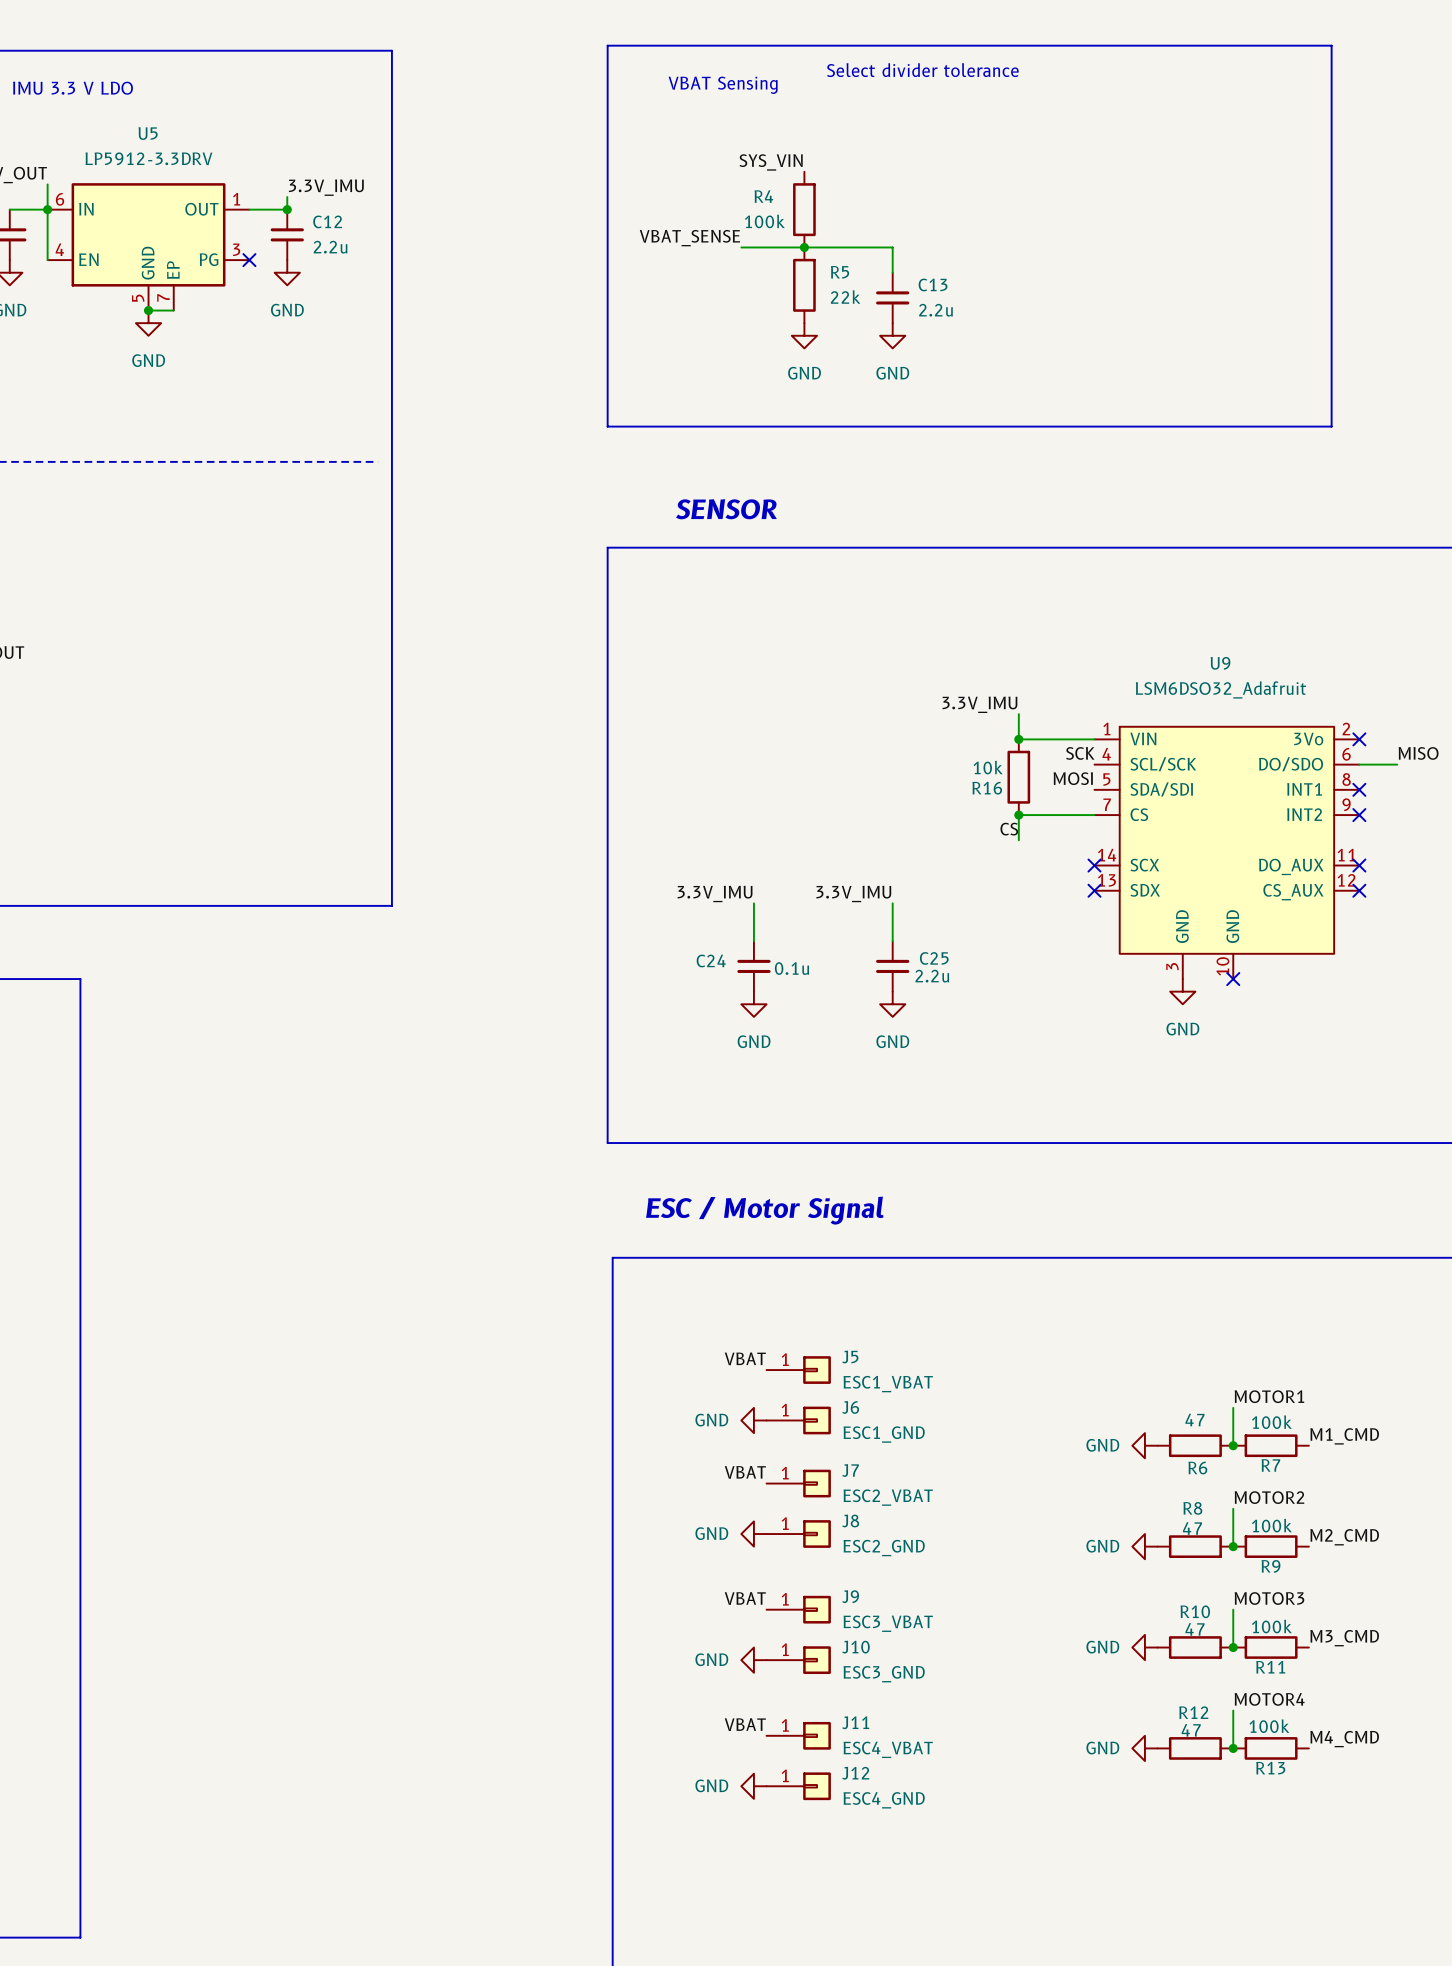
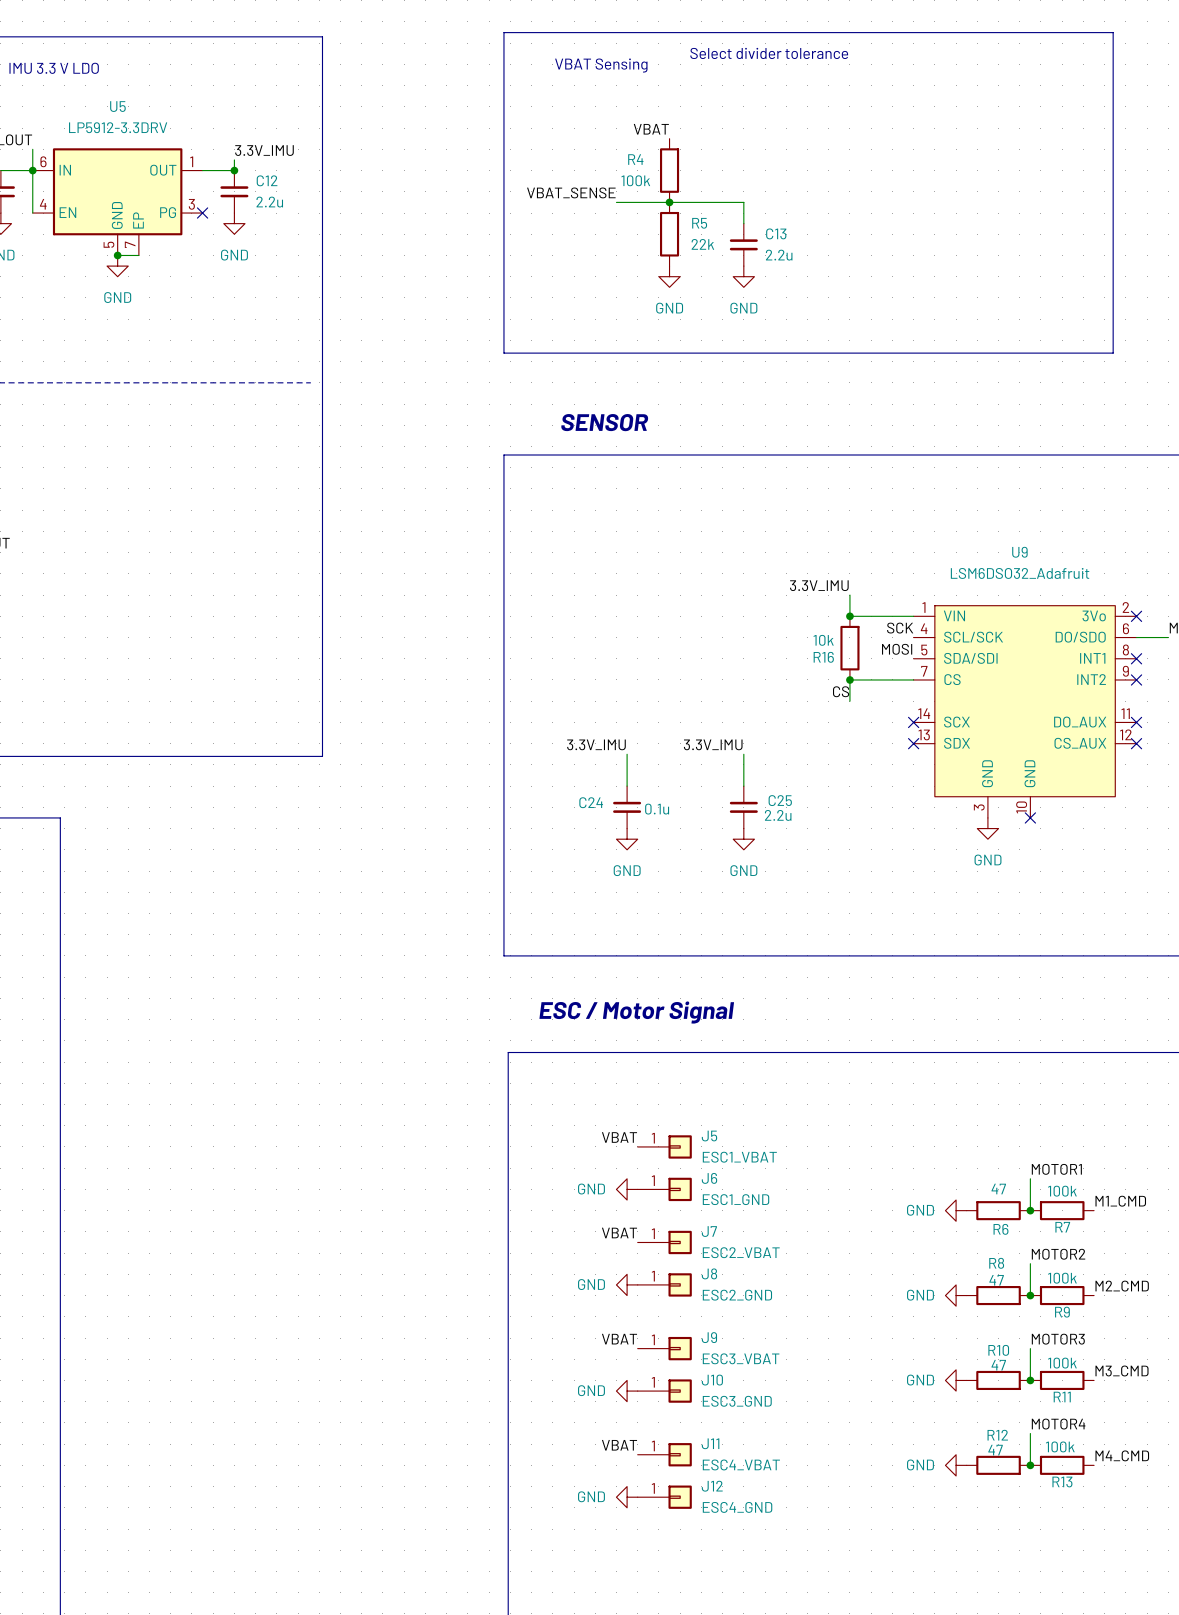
label: SYS_VIN (771, 162) -> VBAT (651, 129)

